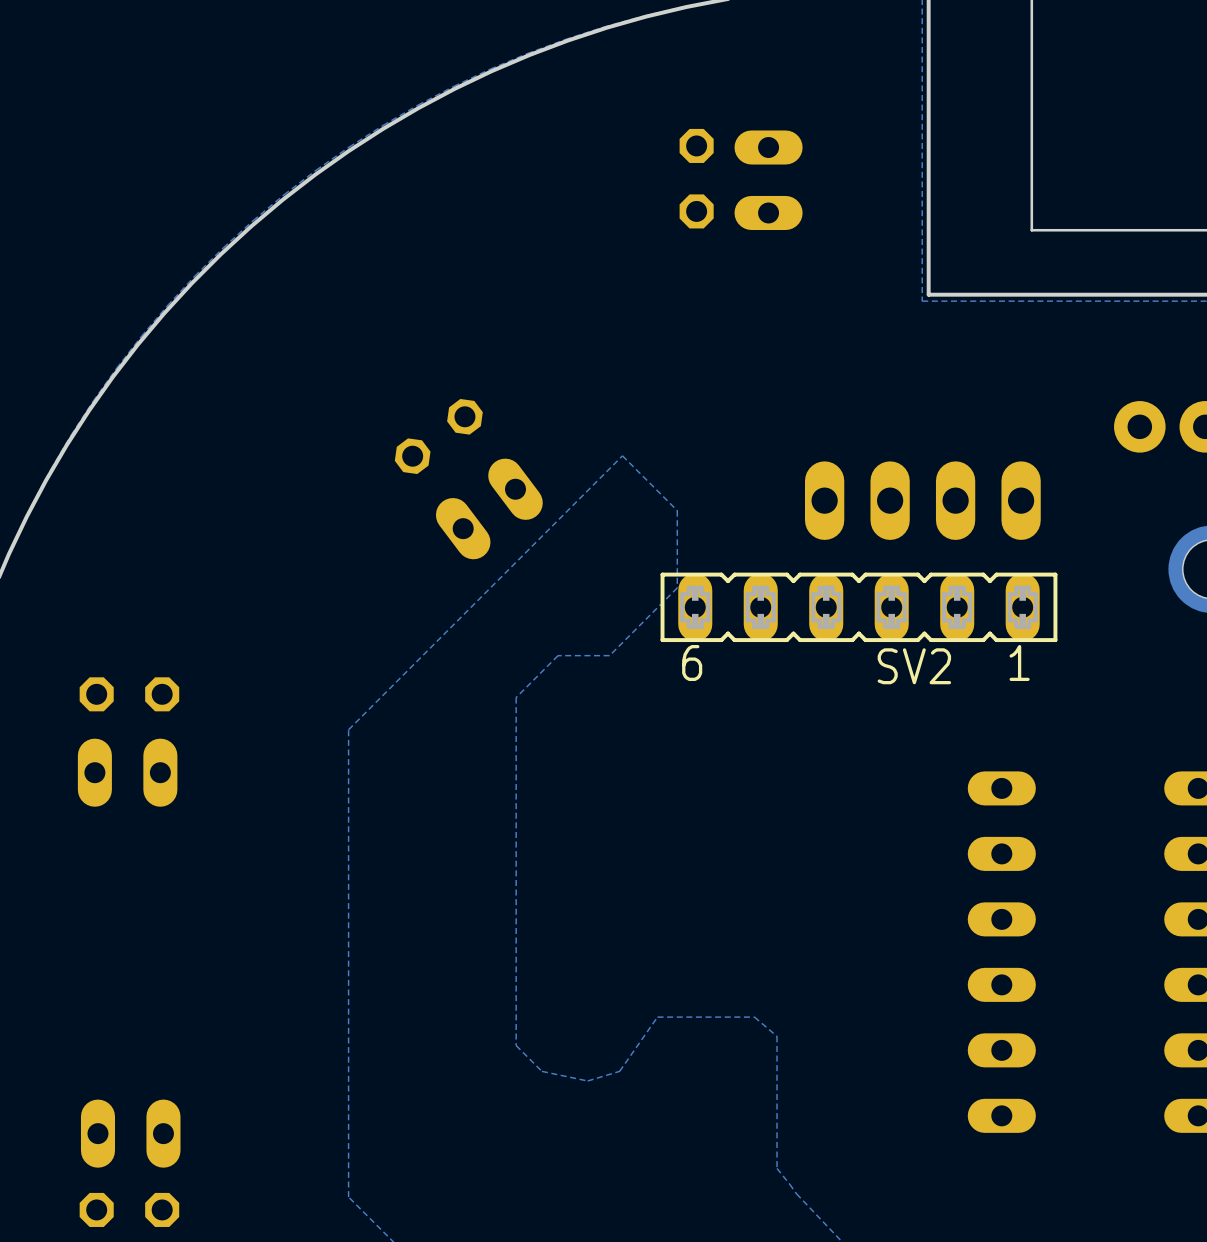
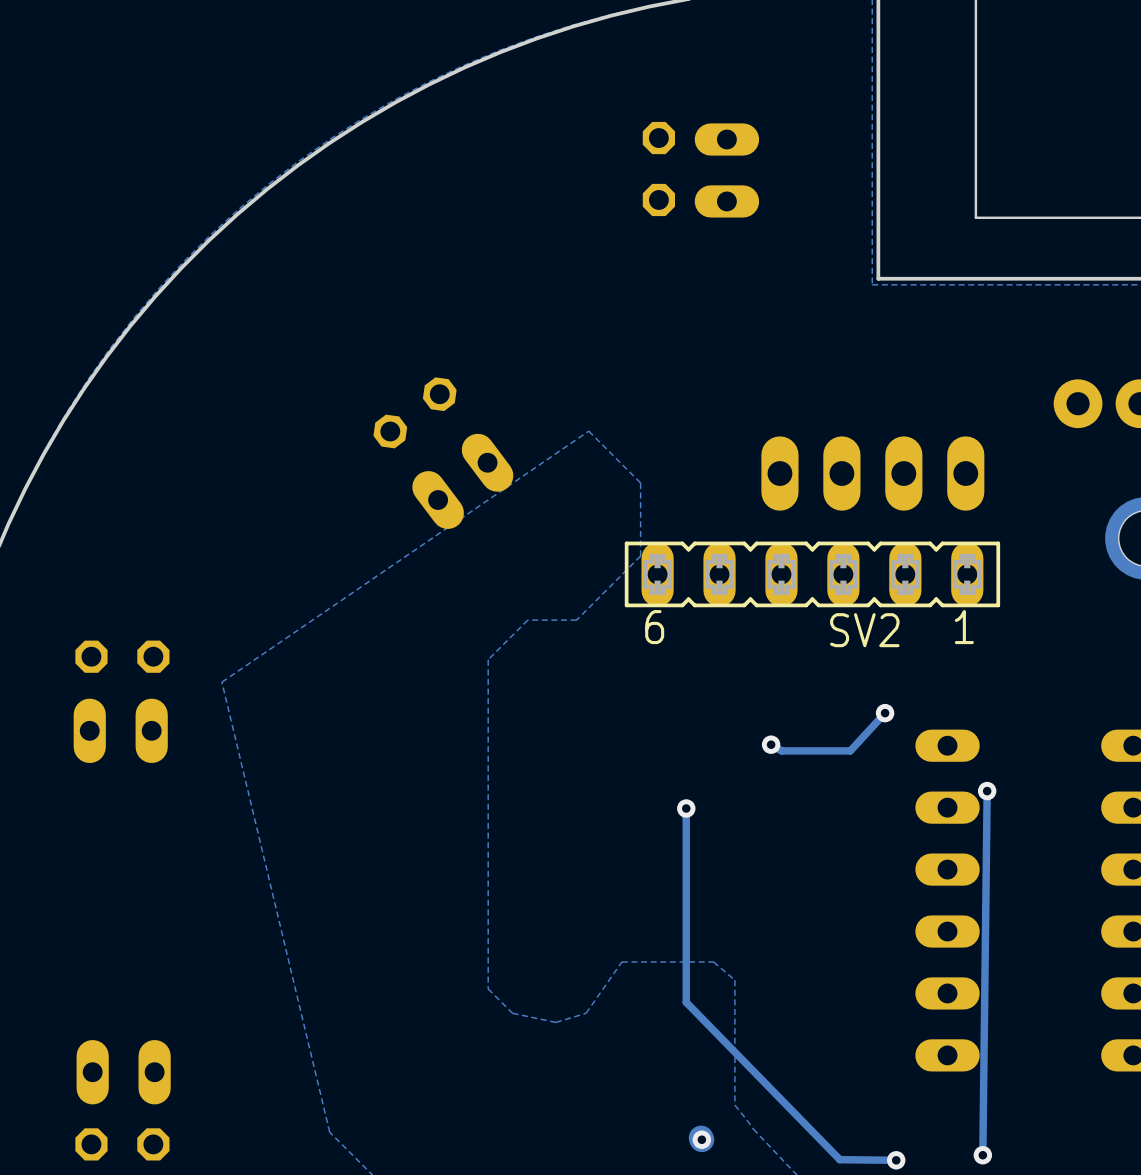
zone outline: (622, 455) (348, 729) (348, 1197) -> (588, 431) (221, 682) (329, 1132)
track: none -> (885, 713) (850, 750) (781, 750) (771, 744)
via: none -> (885, 713)
via: none -> (771, 744)
track: none -> (987, 791) (982, 1155)
via: none -> (987, 791)
via: none -> (686, 808)
track: none -> (685, 815) (686, 808) (686, 1002) (839, 1159) (896, 1160)
track: none -> (701, 1138) (701, 1139)
via: none -> (701, 1139)
via: none -> (982, 1155)
via: none -> (896, 1160)

